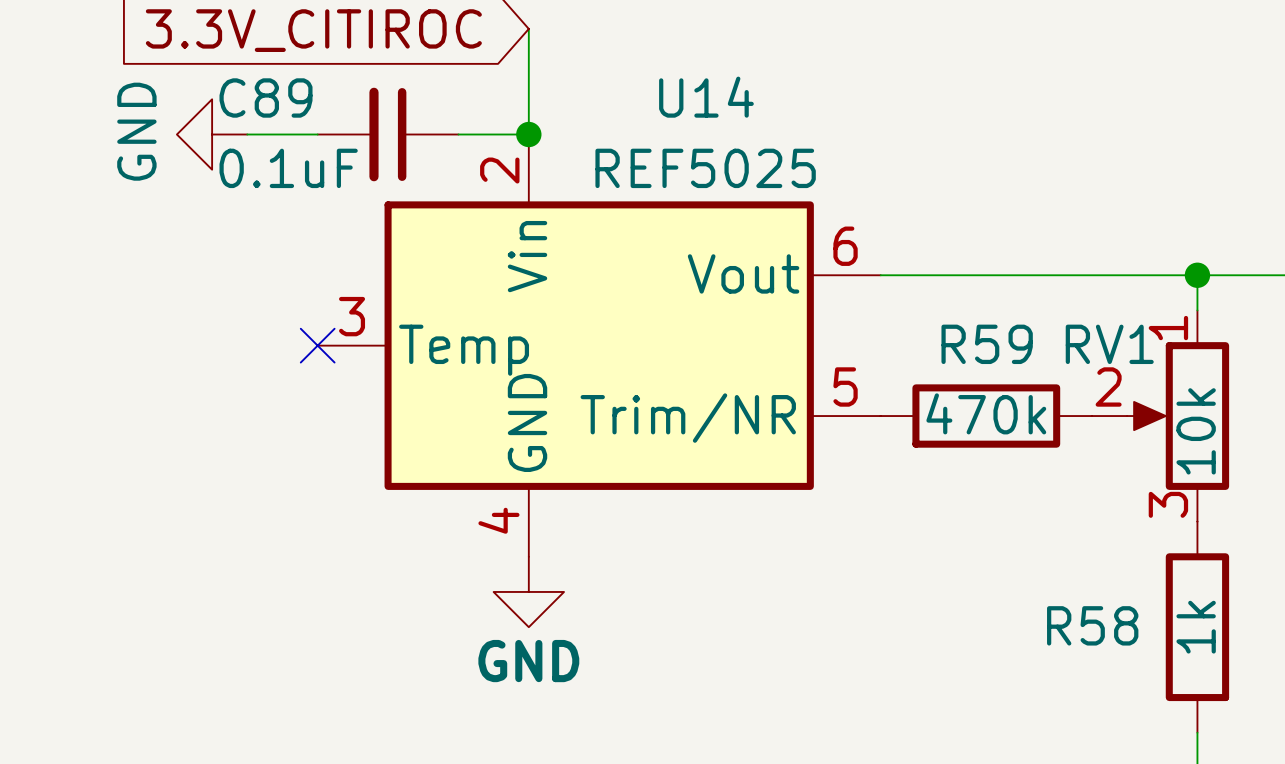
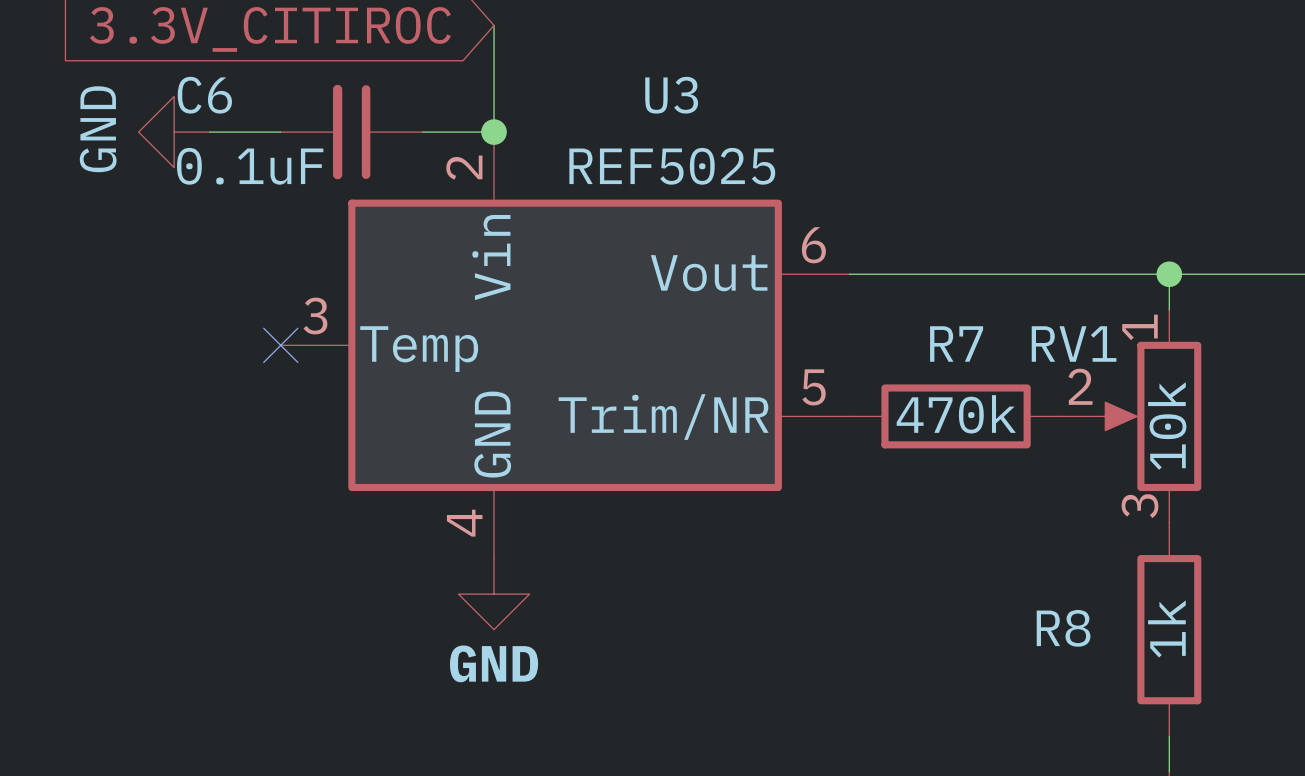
C89 name: C89 (266, 97) -> C6 (204, 95)
U14 name: U14 (706, 97) -> U3 (671, 95)
R59 name: R59 (987, 344) -> R7 (956, 344)
R58 name: R58 (1092, 625) -> R8 (1063, 628)

